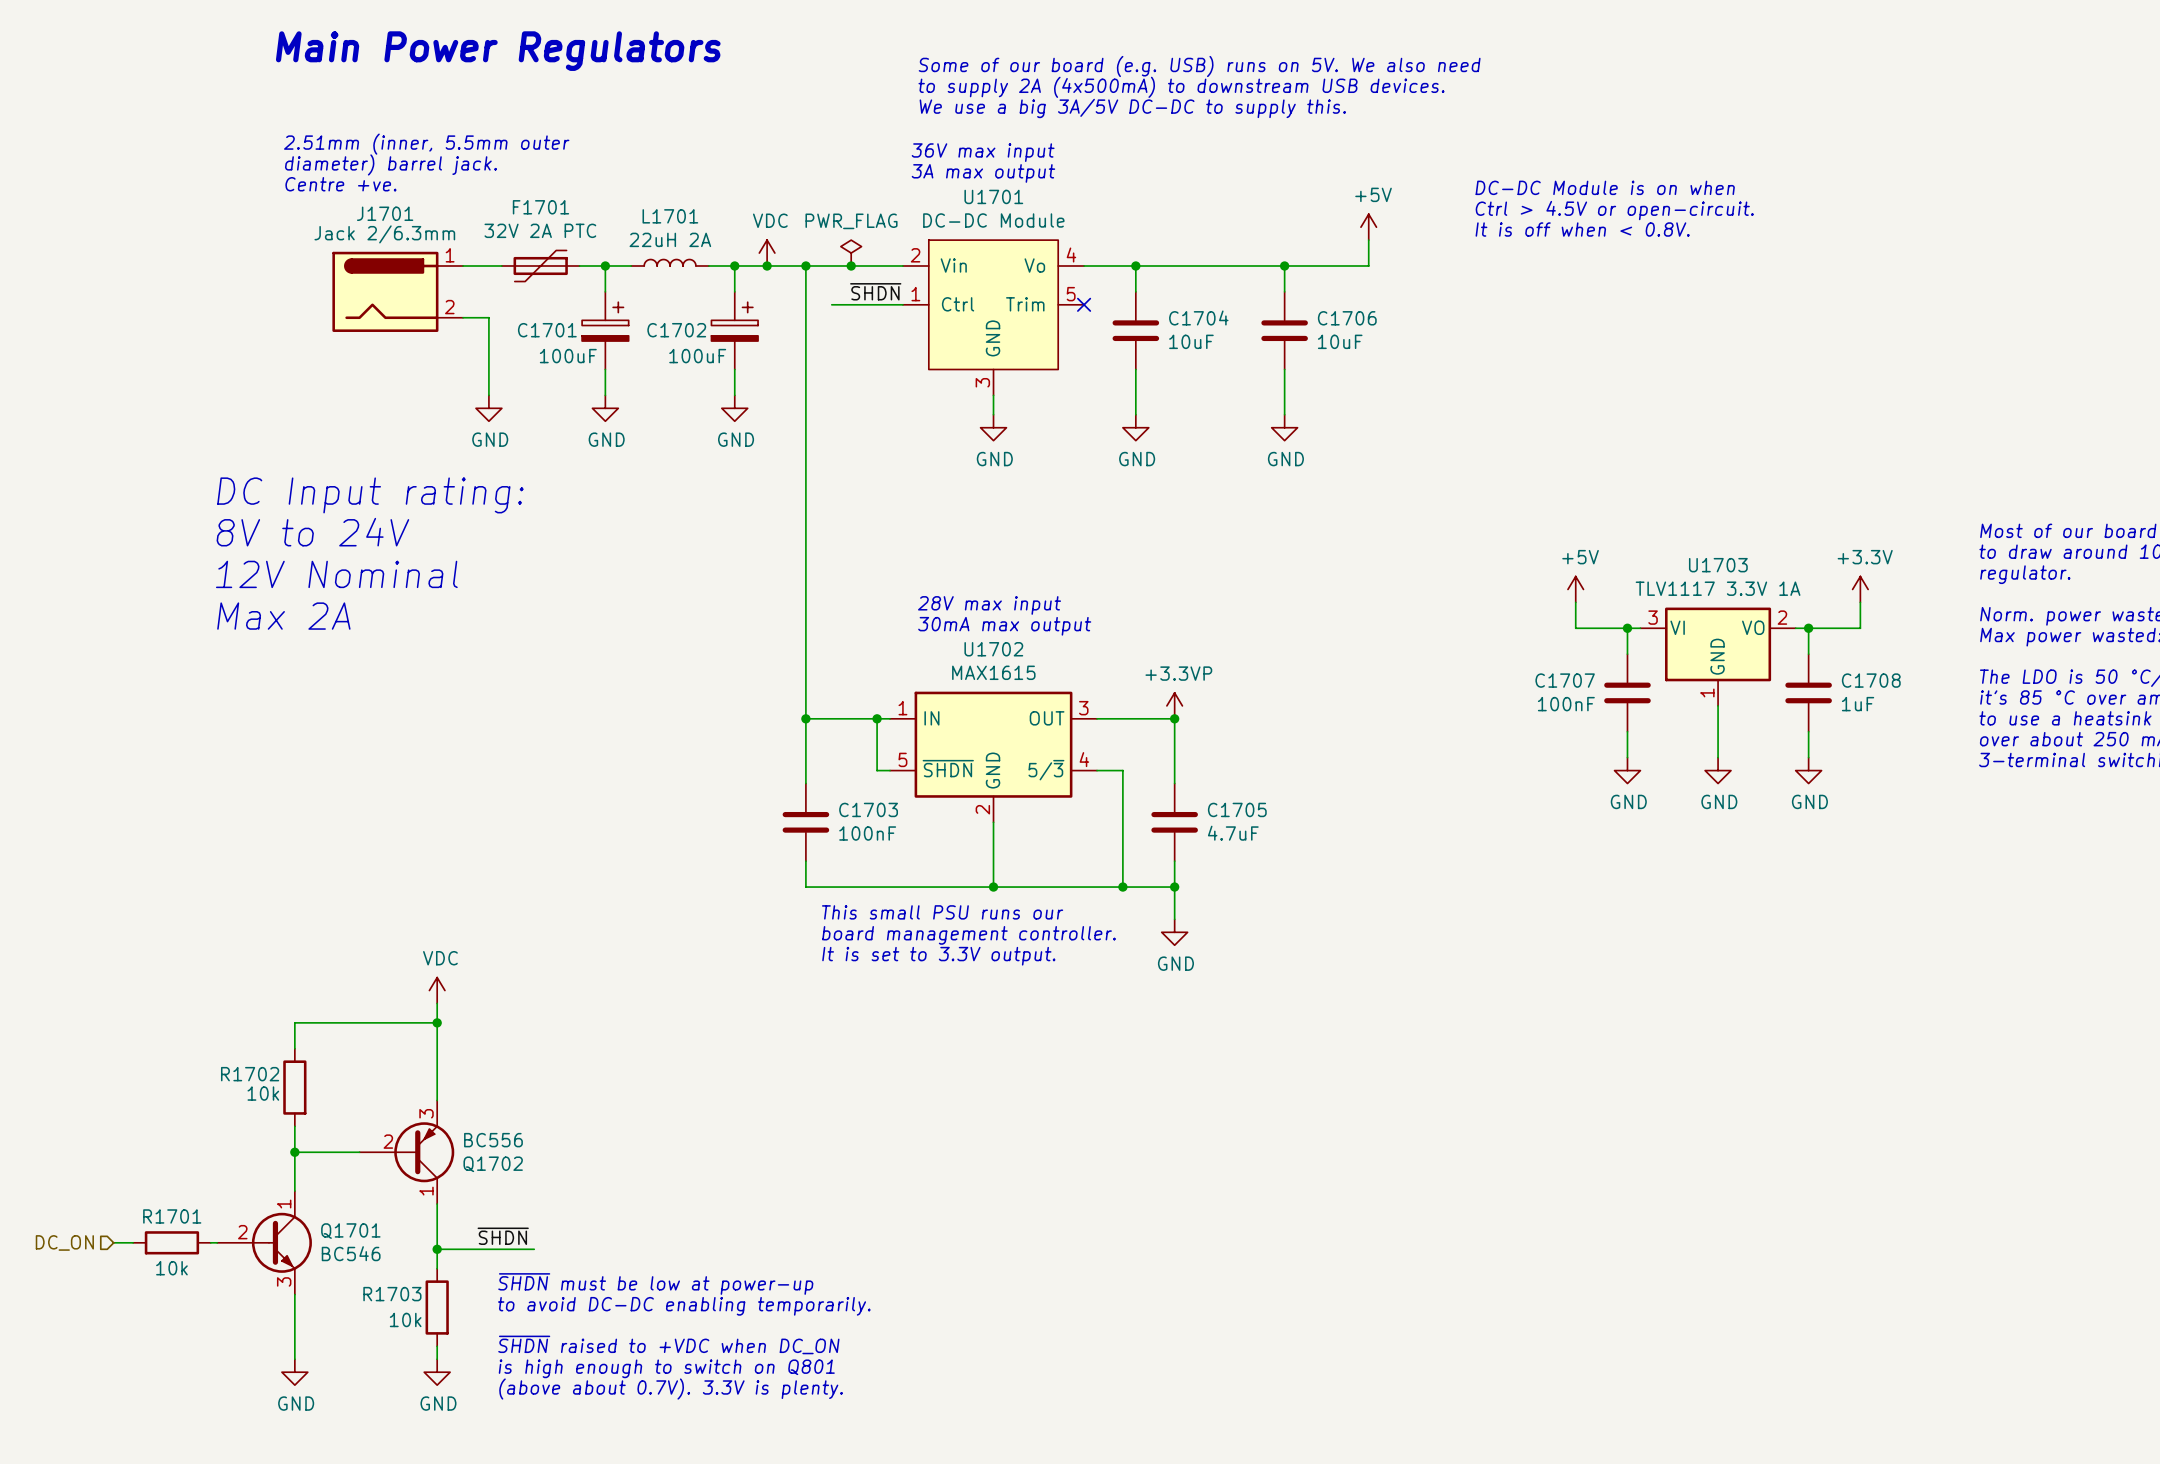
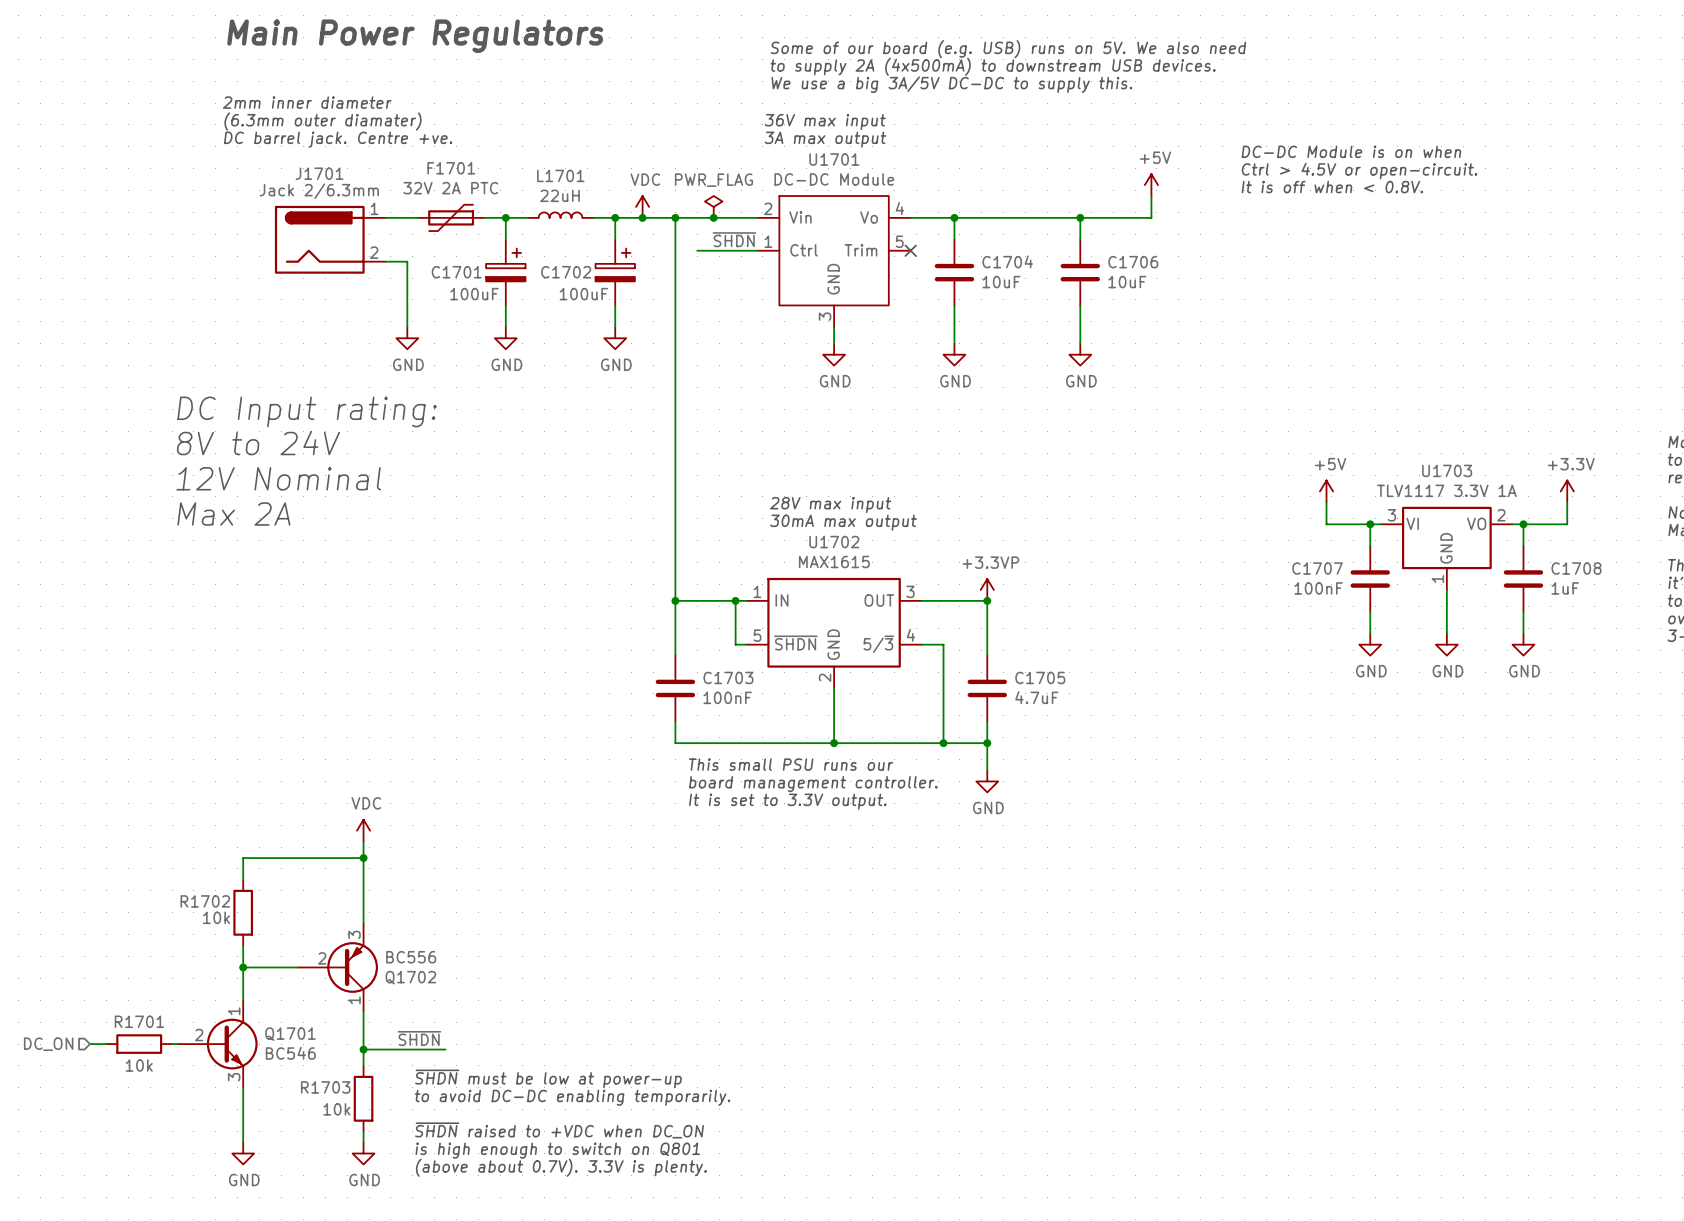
text: 2.51mm (inner, 5.5mm outer (426, 144) -> 2mm inner diameter (307, 102)
text: none -> (6.3mm outer diamater) (322, 121)
text: diameter) barrel jack. (390, 164) -> none
text: none -> DC barrel jack. Centre +ve. (338, 139)
text: Centre +ve. (340, 184) -> none
L1701 value: 22uH 2A (670, 239) -> 22uH (560, 195)

